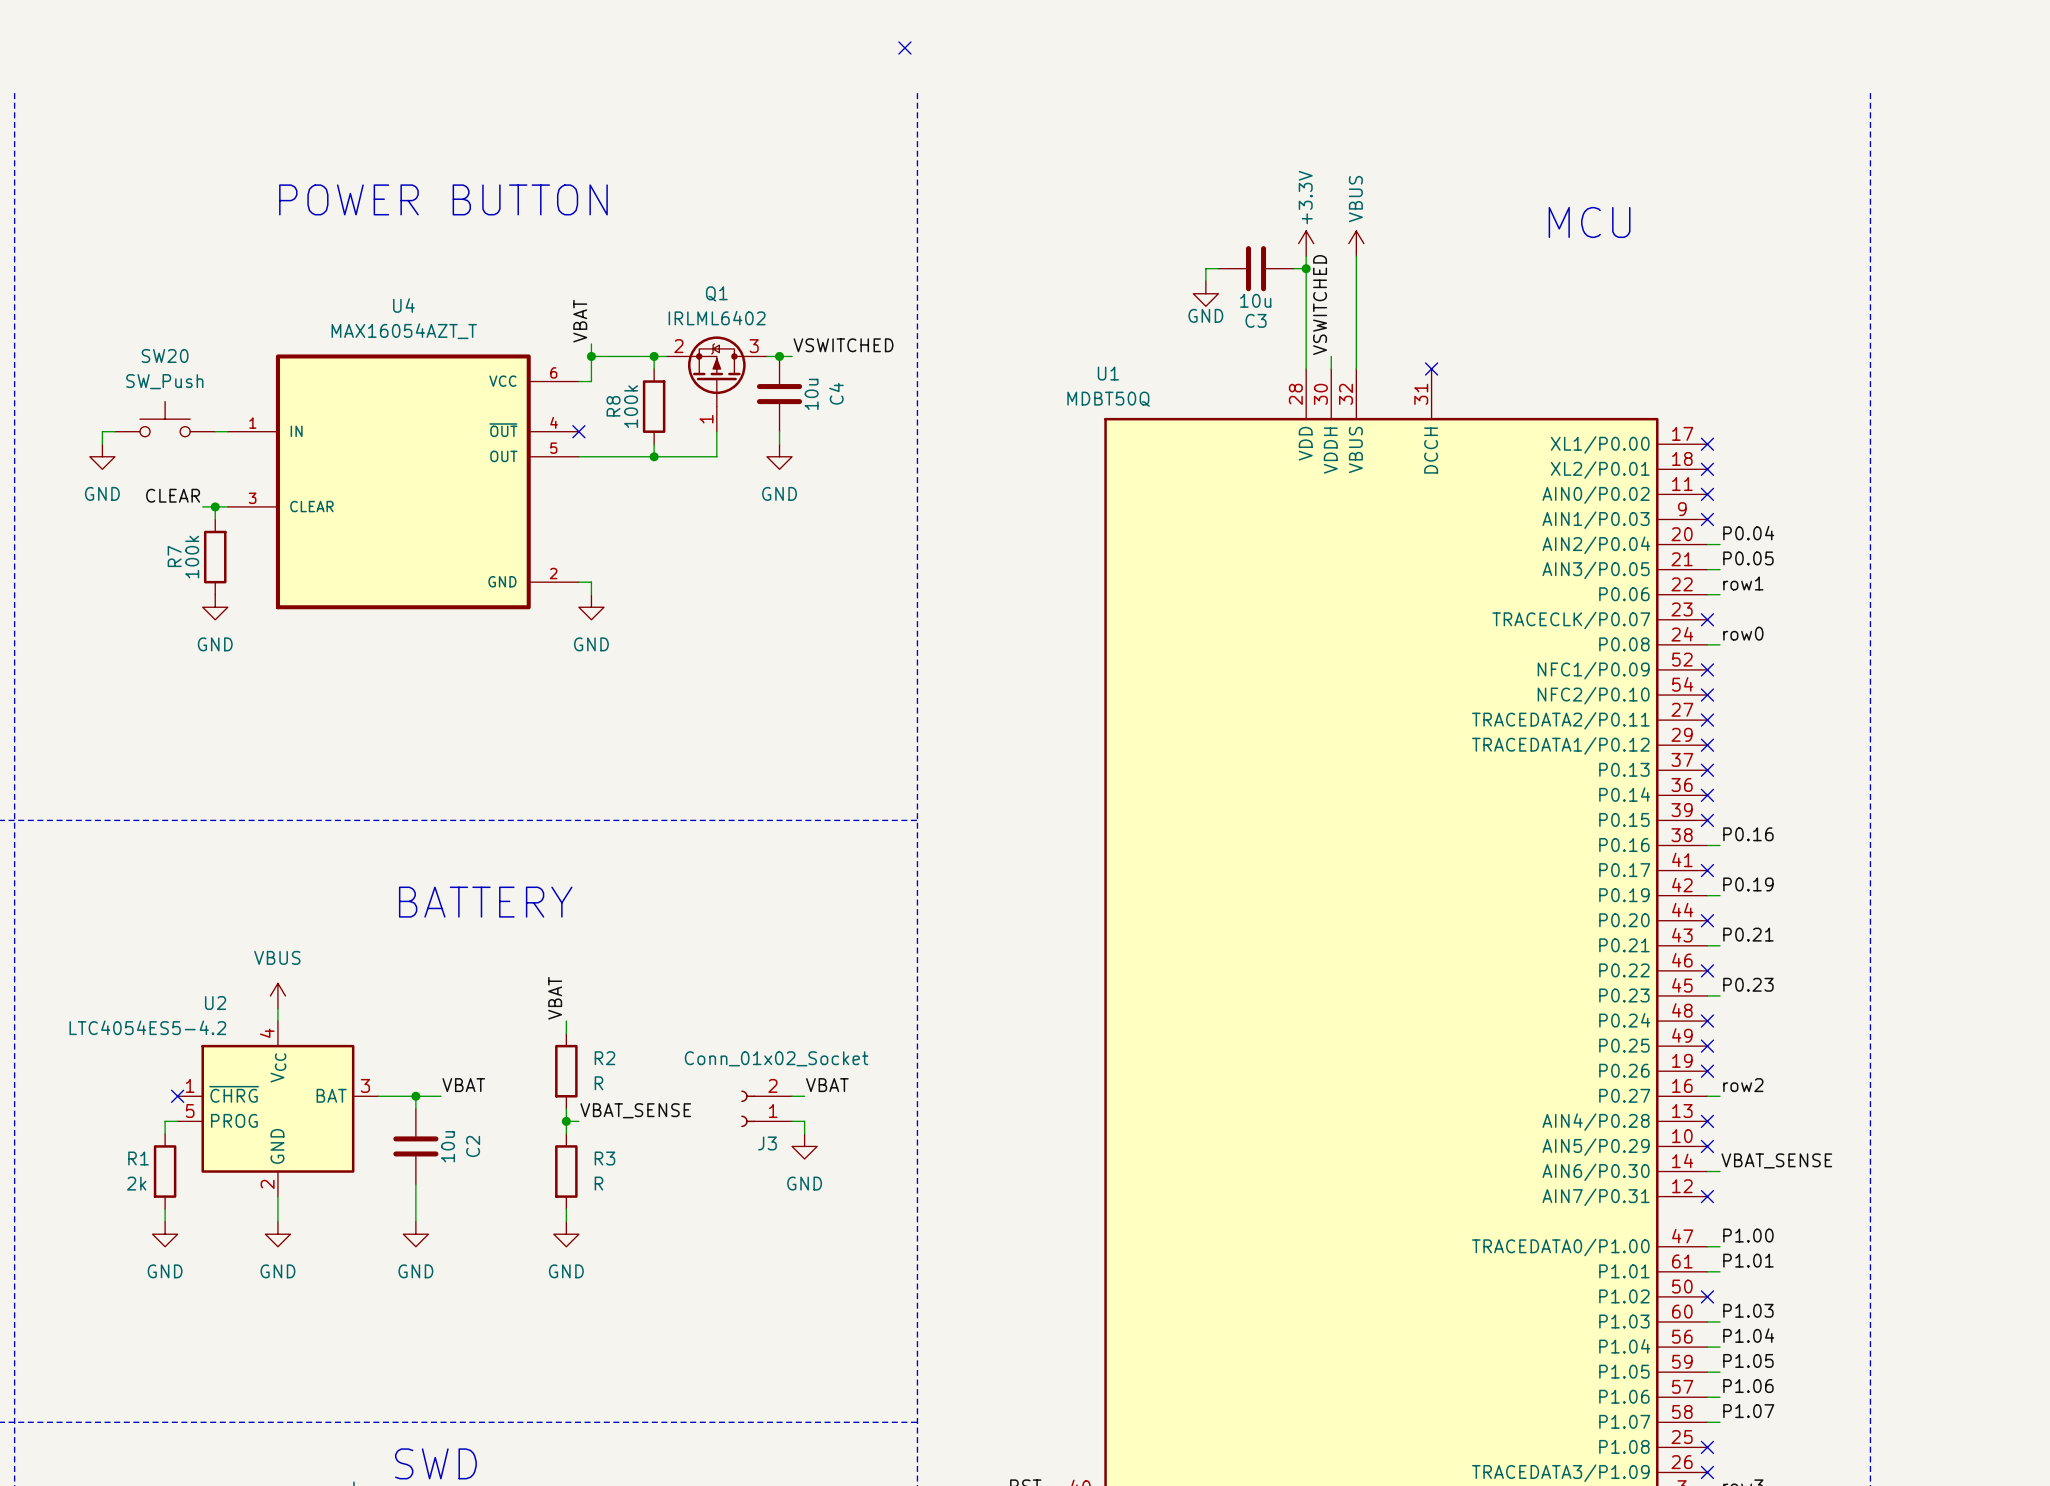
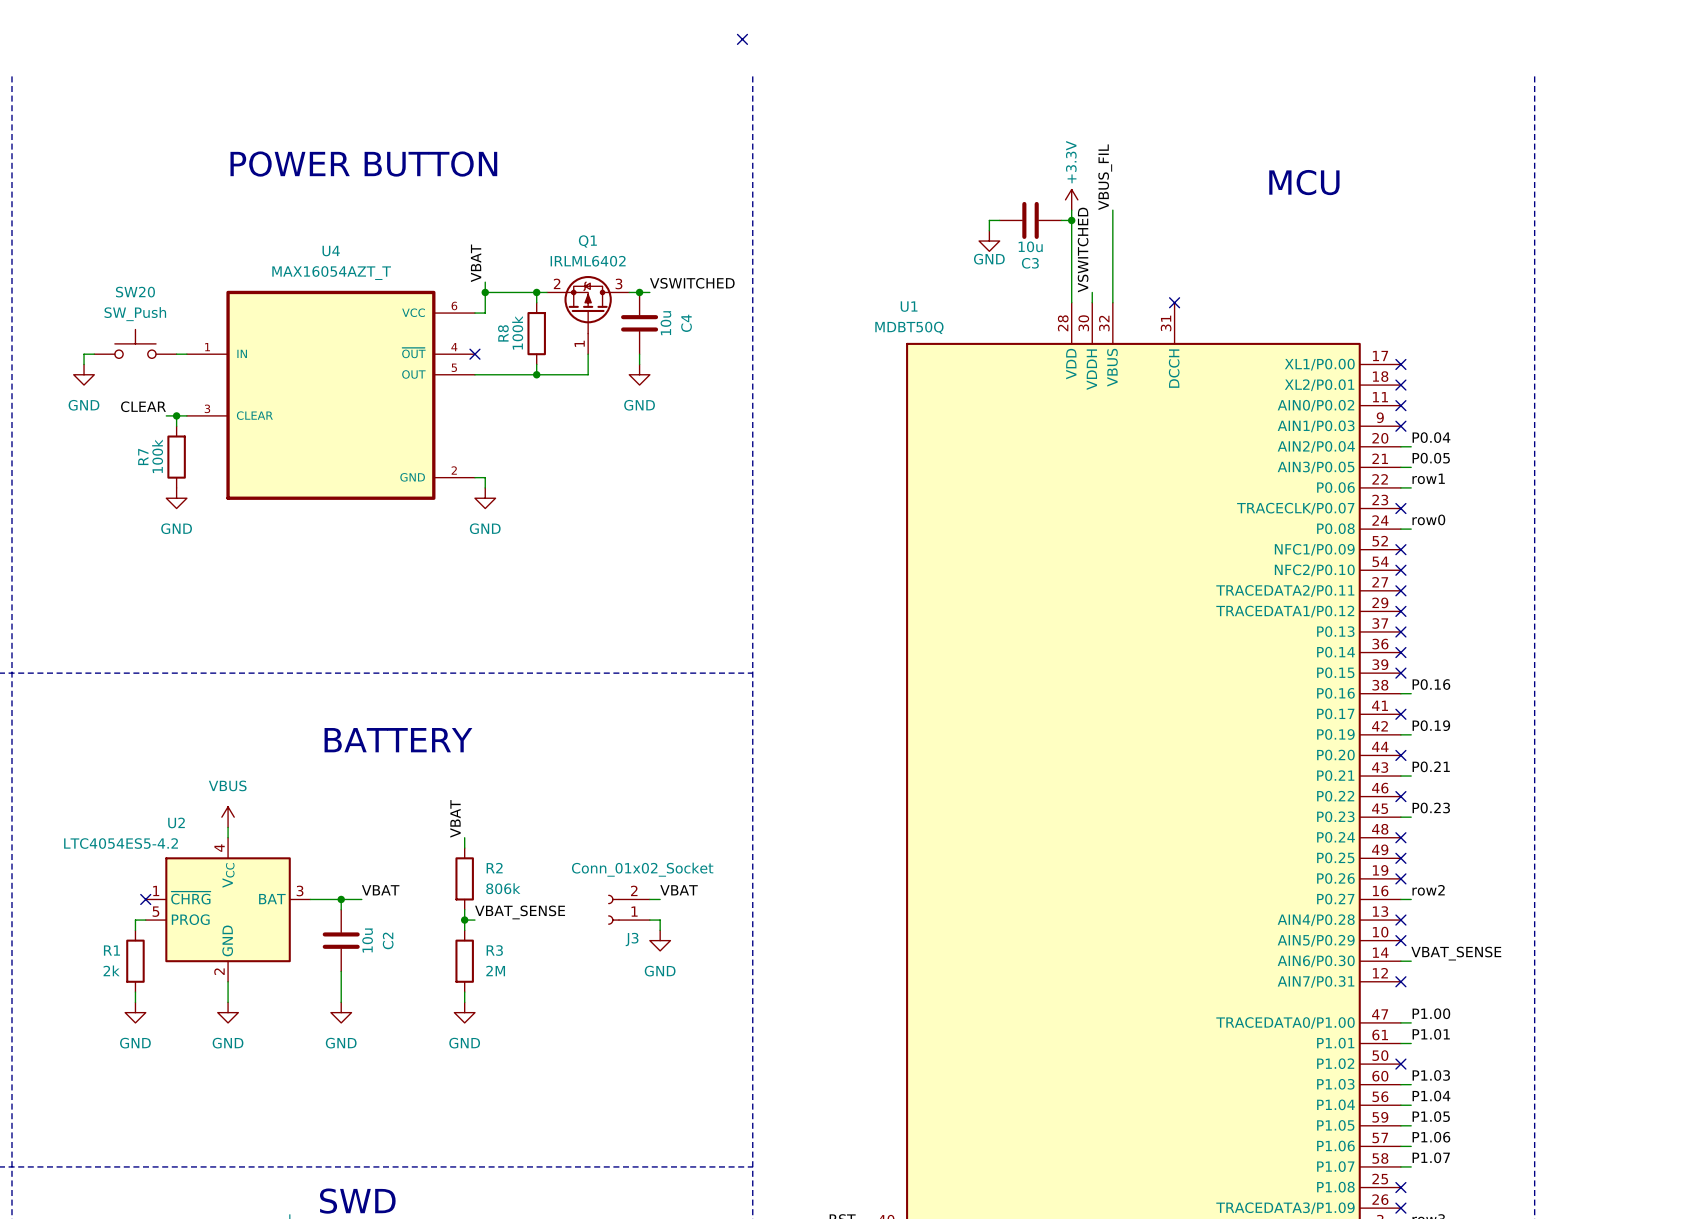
label: none -> VBUS_FIL (1105, 177)
power symbol: VBUS (1356, 243) -> none
R2 value: R (598, 1083) -> 806k (503, 888)
R3 value: R (598, 1183) -> 2M (495, 971)

